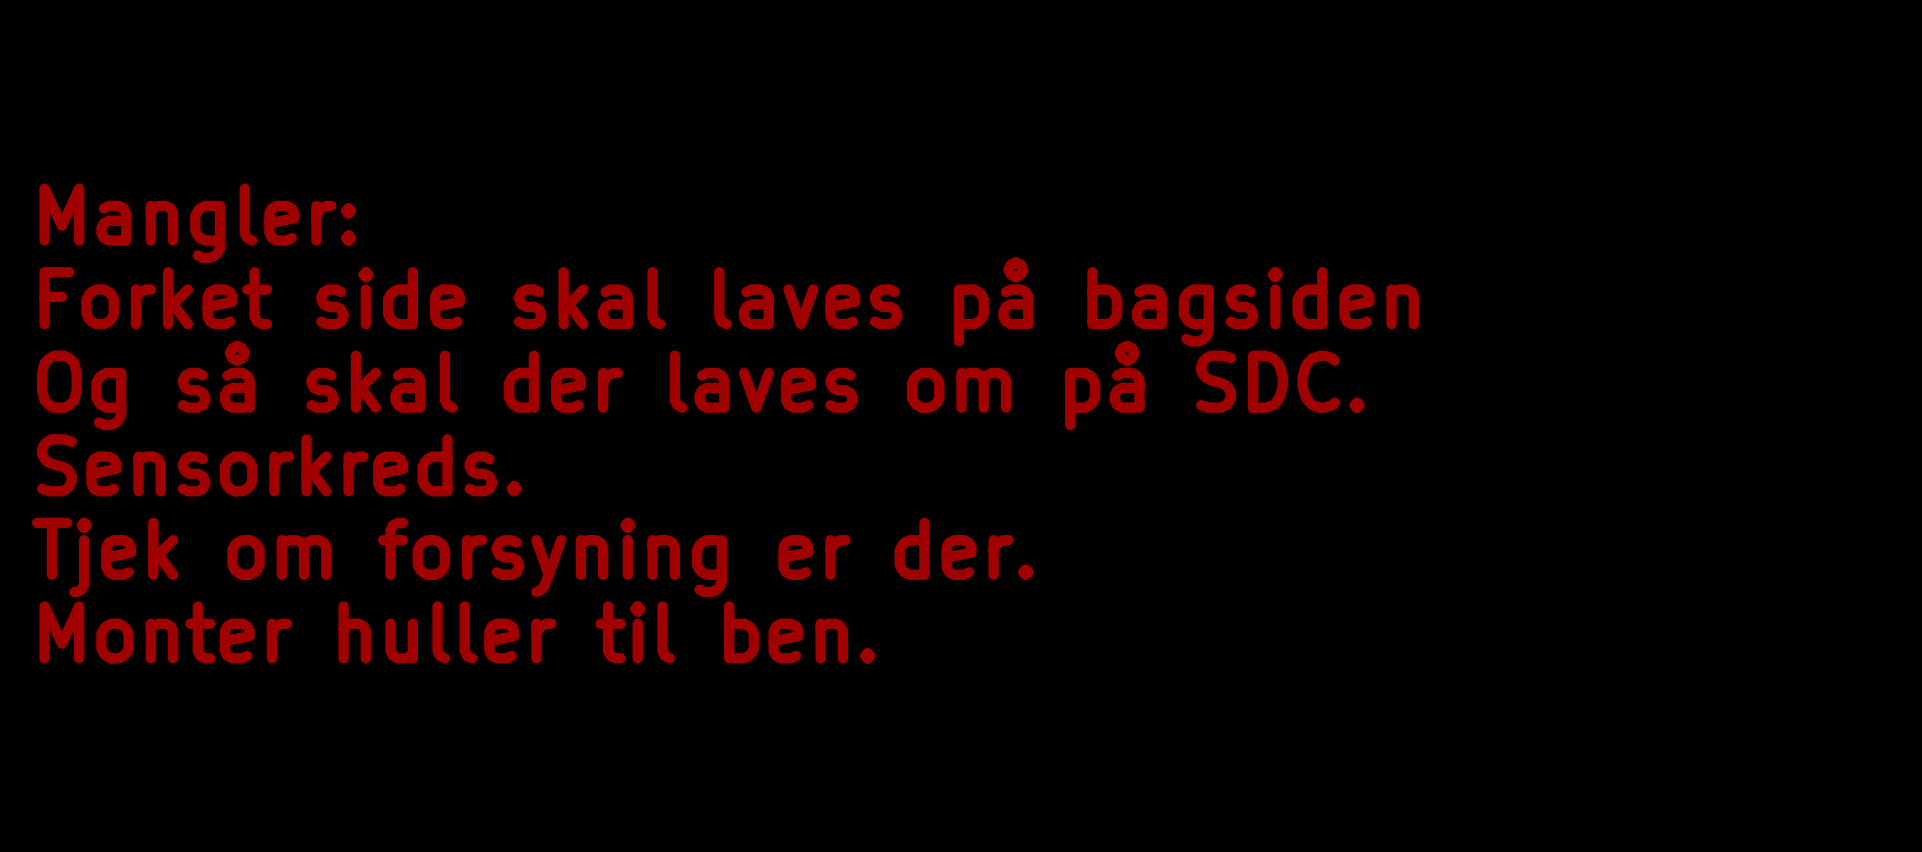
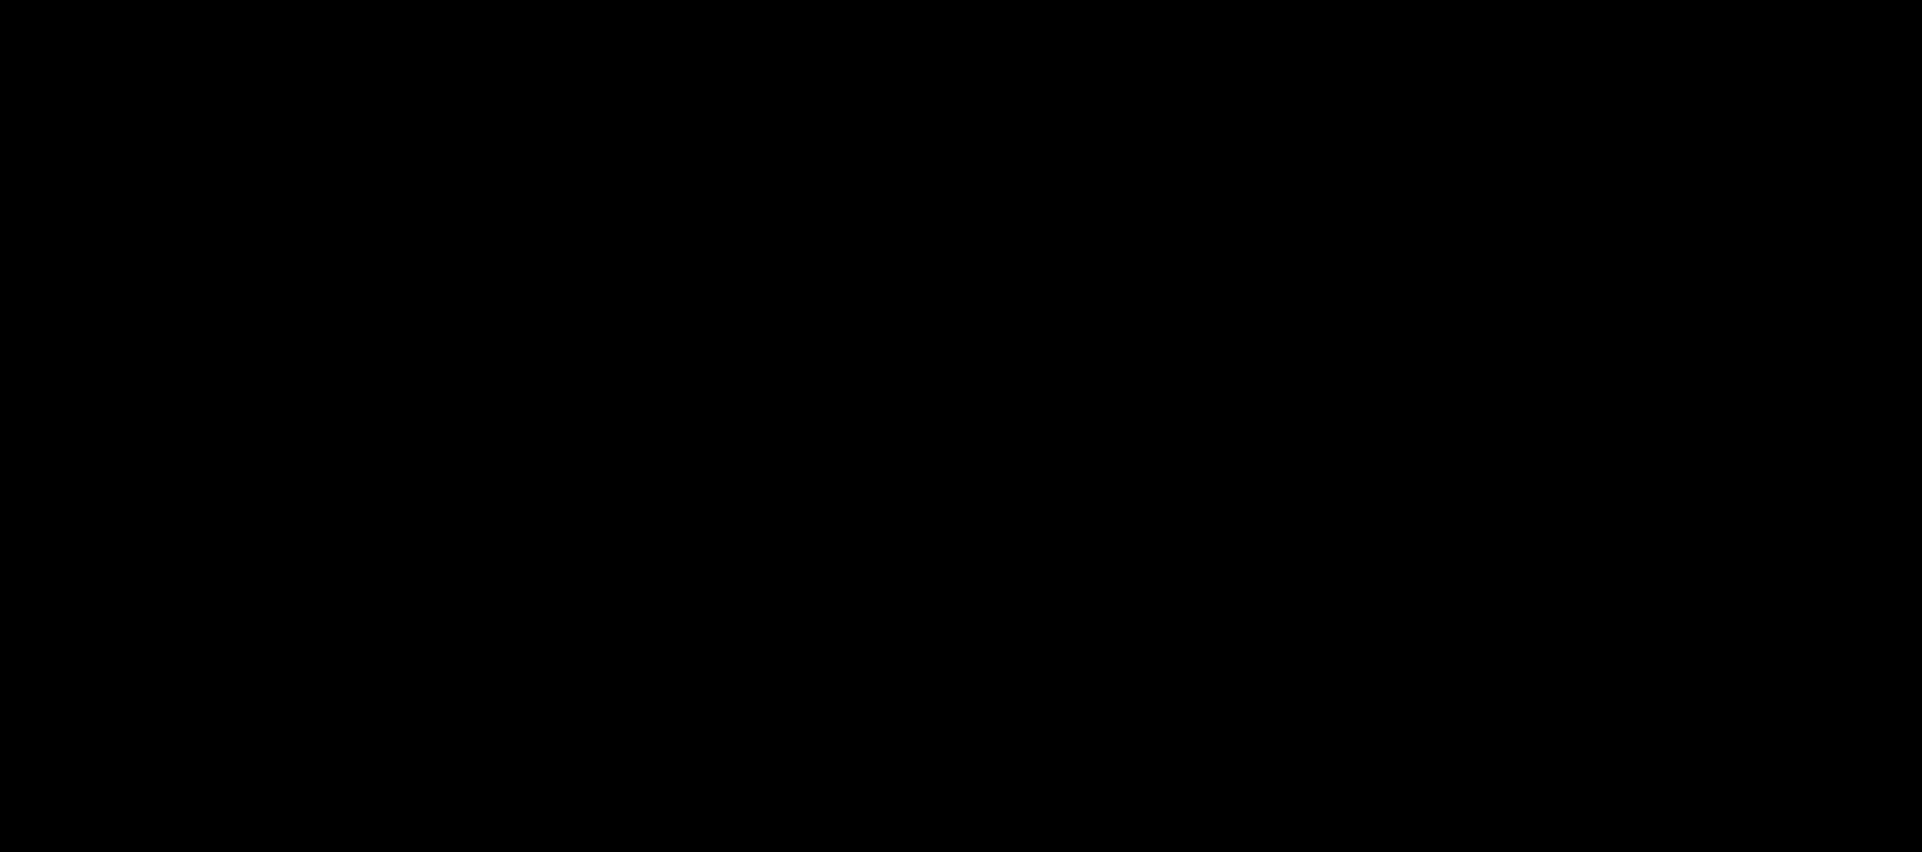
text: Mangler: (197, 223) -> none
text: Forket side skal laves på bagsiden (729, 301) -> none
text: Og så skal der laves om på SDC. (700, 385) -> none
text: Sensorkreds. (279, 465) -> none
text: Tjek om forsyning er der. (532, 557) -> none
text: Monter huller til ben. (457, 632) -> none

